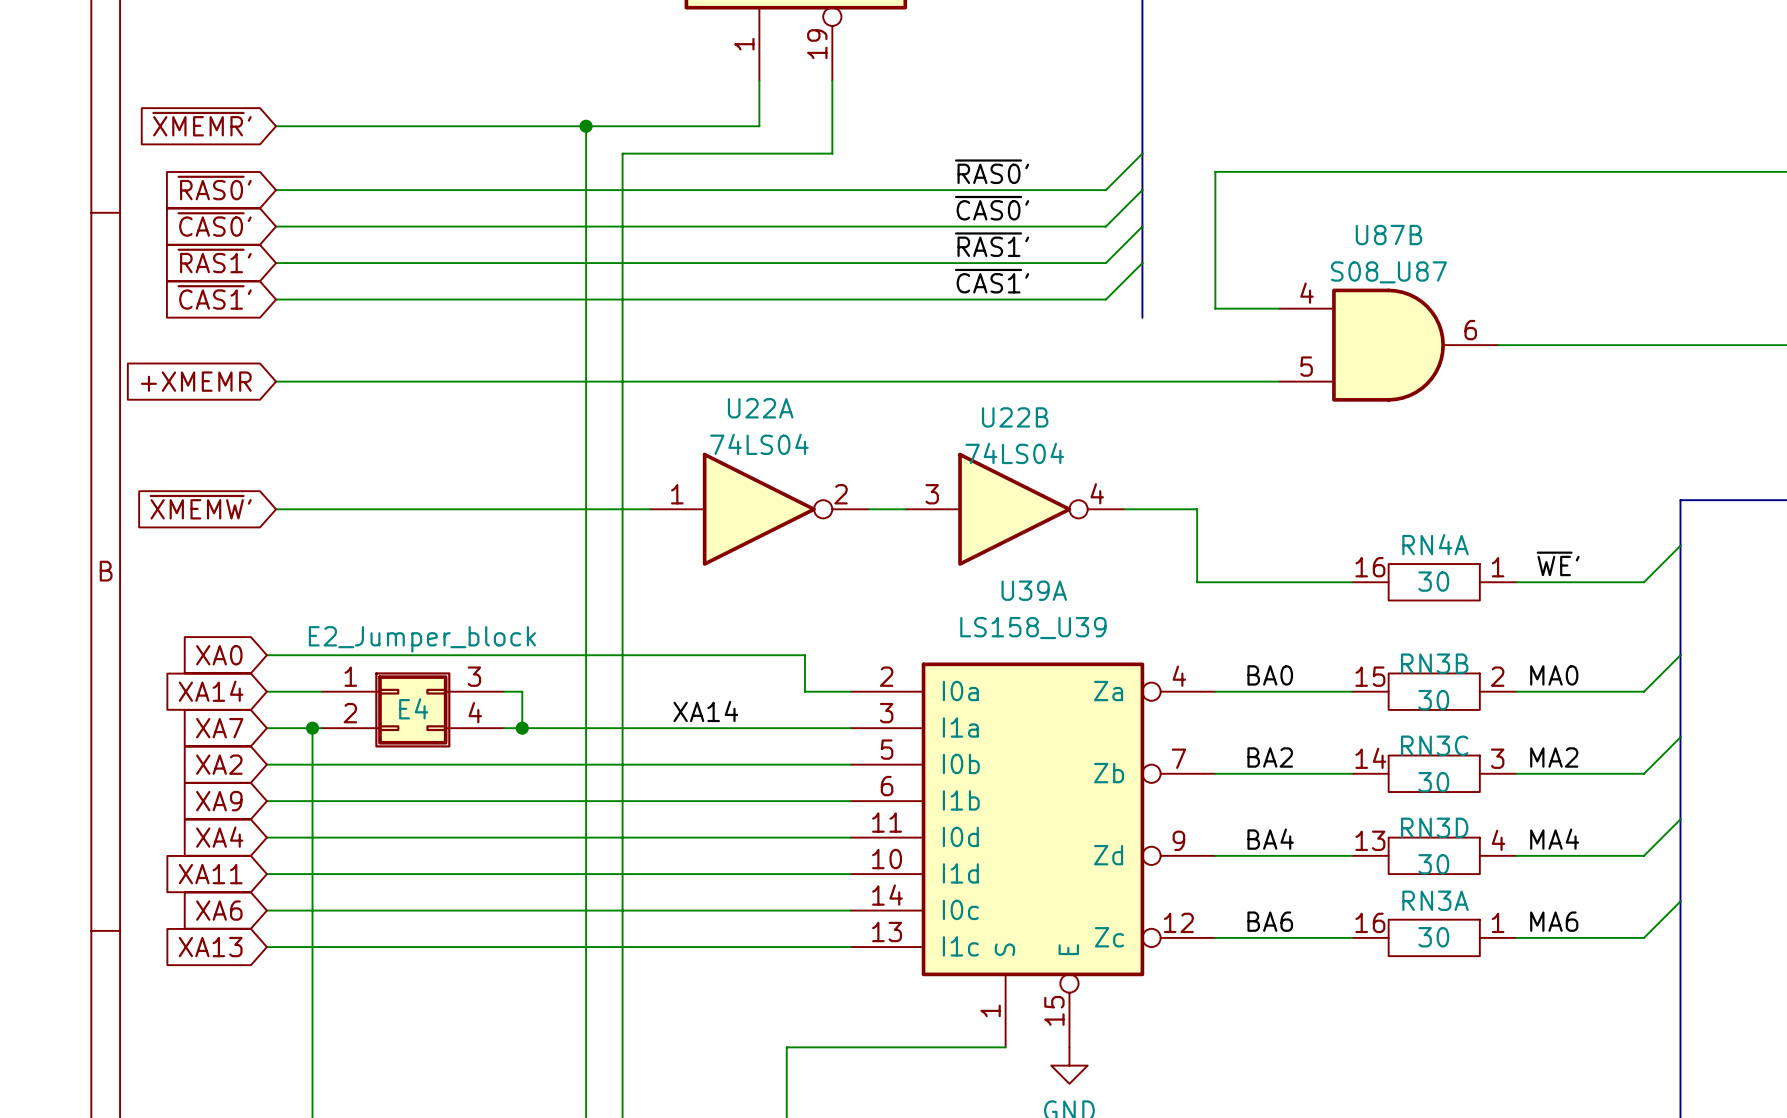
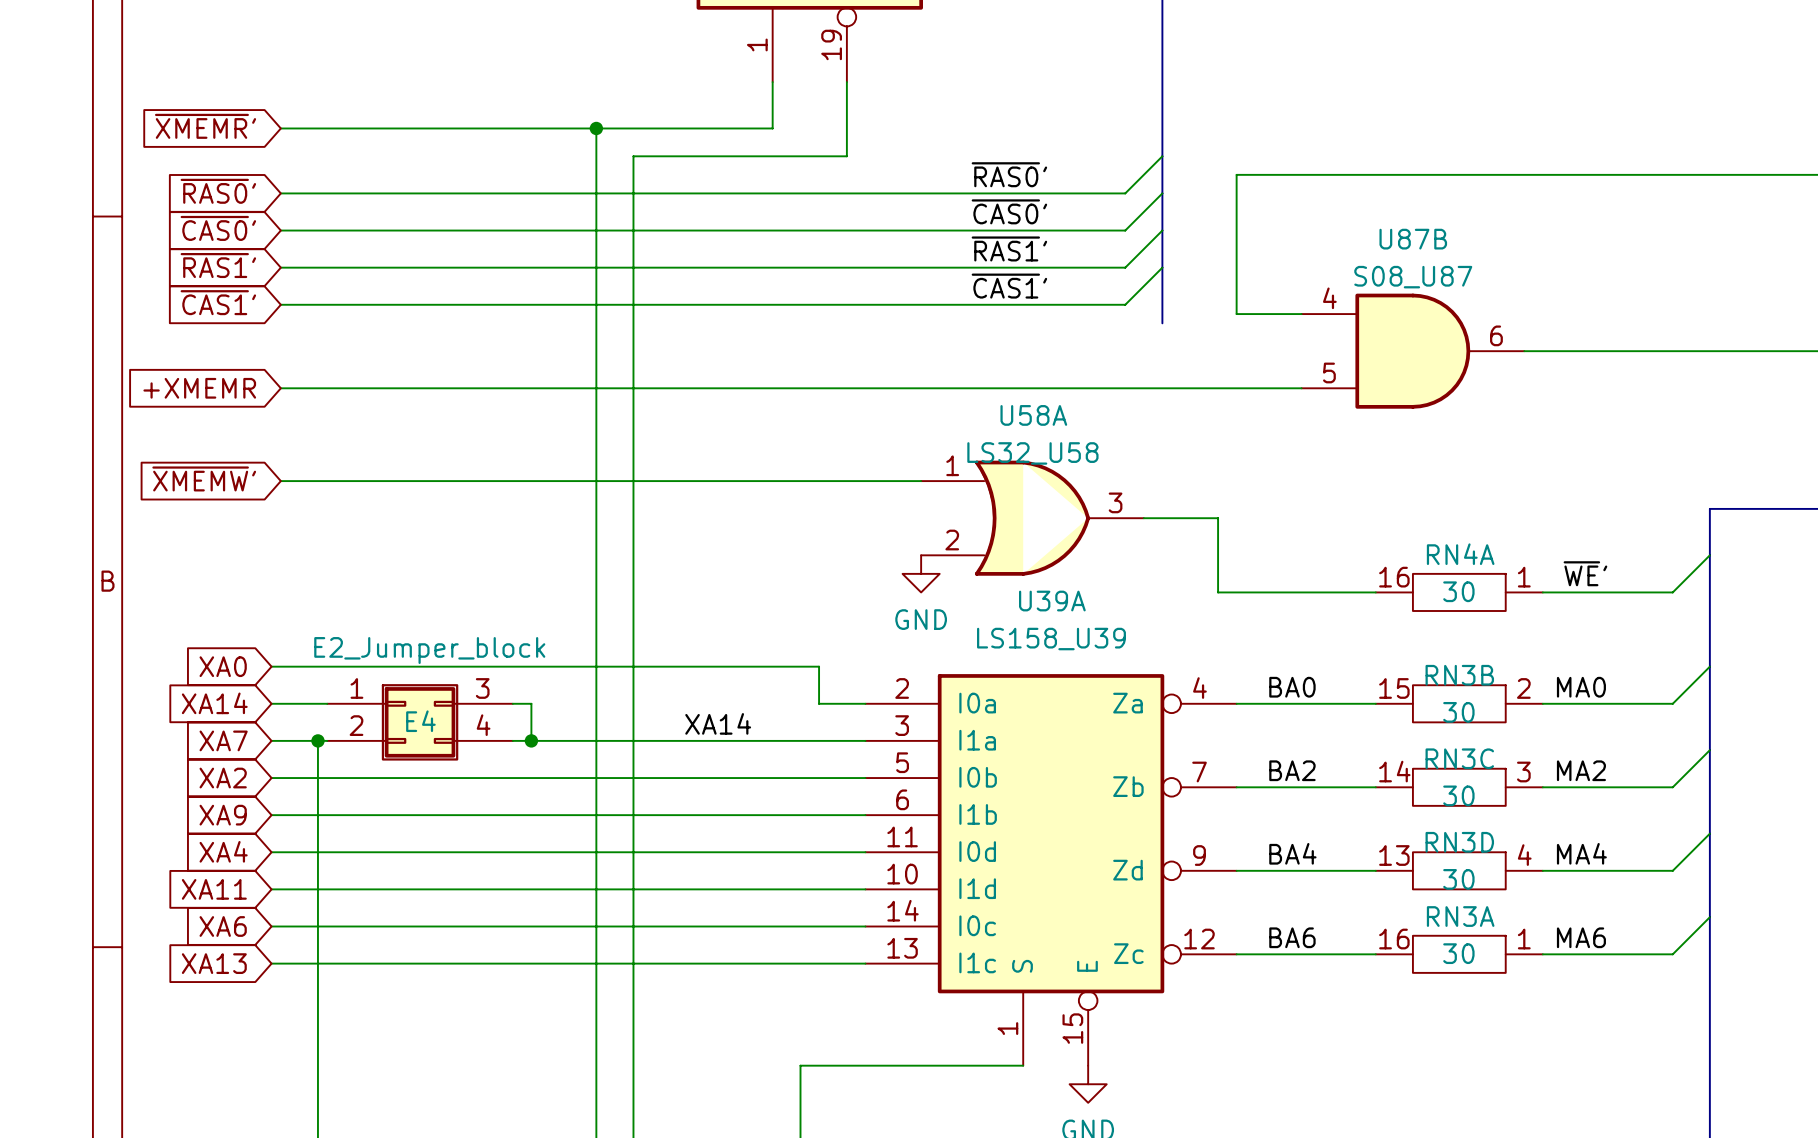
wire: none -> (280, 481) (921, 481)
global label position: ~{XMEMW}' (200, 507) -> ~{XMEMW}' (204, 478)
wire: (276, 509) (649, 509) -> none
U22A: 74LS04 (759, 509) -> none
wire: (868, 509) (905, 509) -> none
U22B: 74LS04 (1014, 509) -> none
U58A: none -> LS32_U58 (1032, 518)
power symbol: none -> GND (921, 573)

